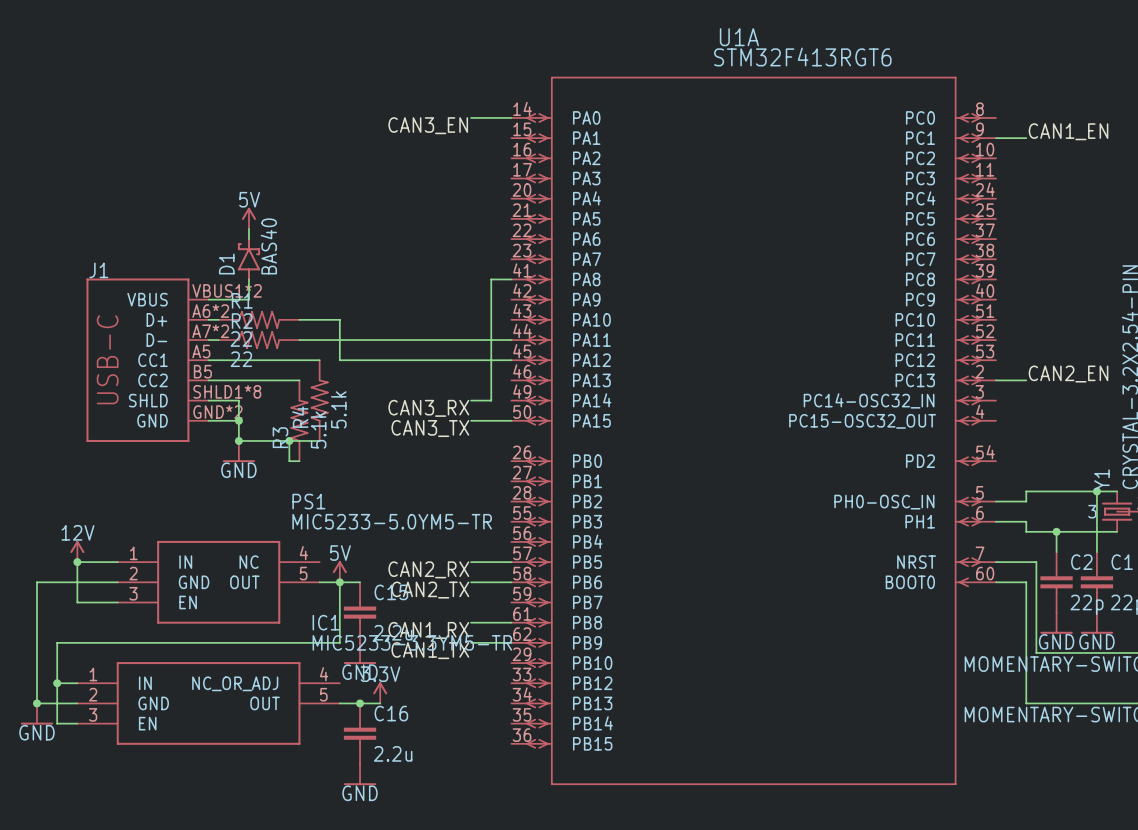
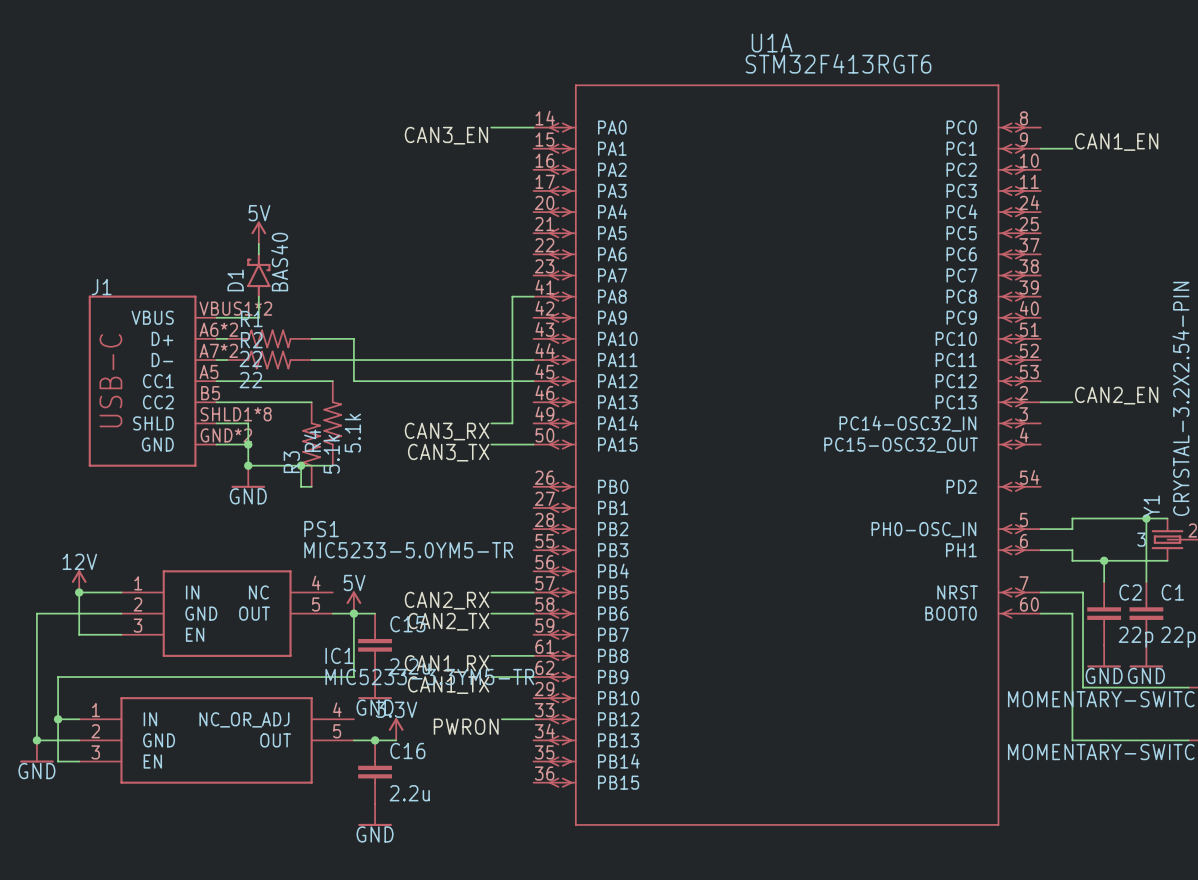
wire: none -> (501, 719) (533, 719)
label: none -> PWRON (466, 726)

